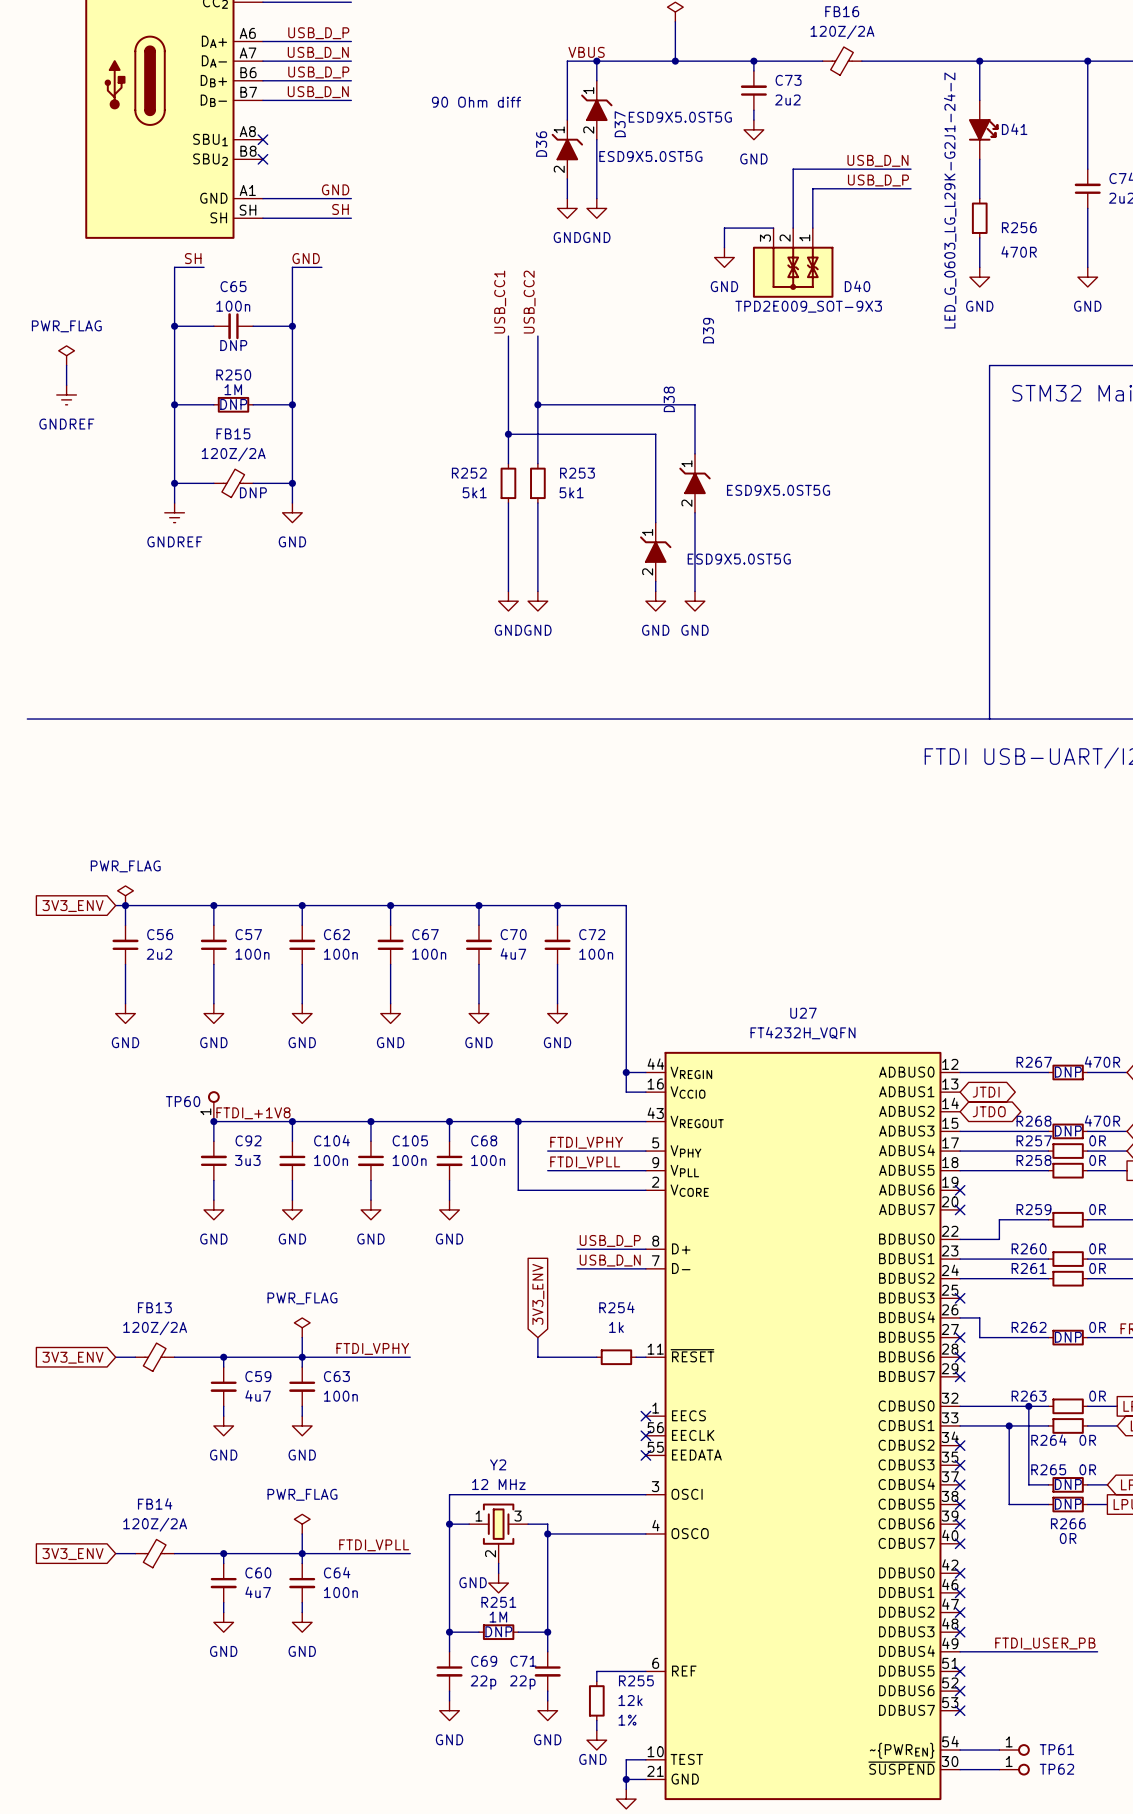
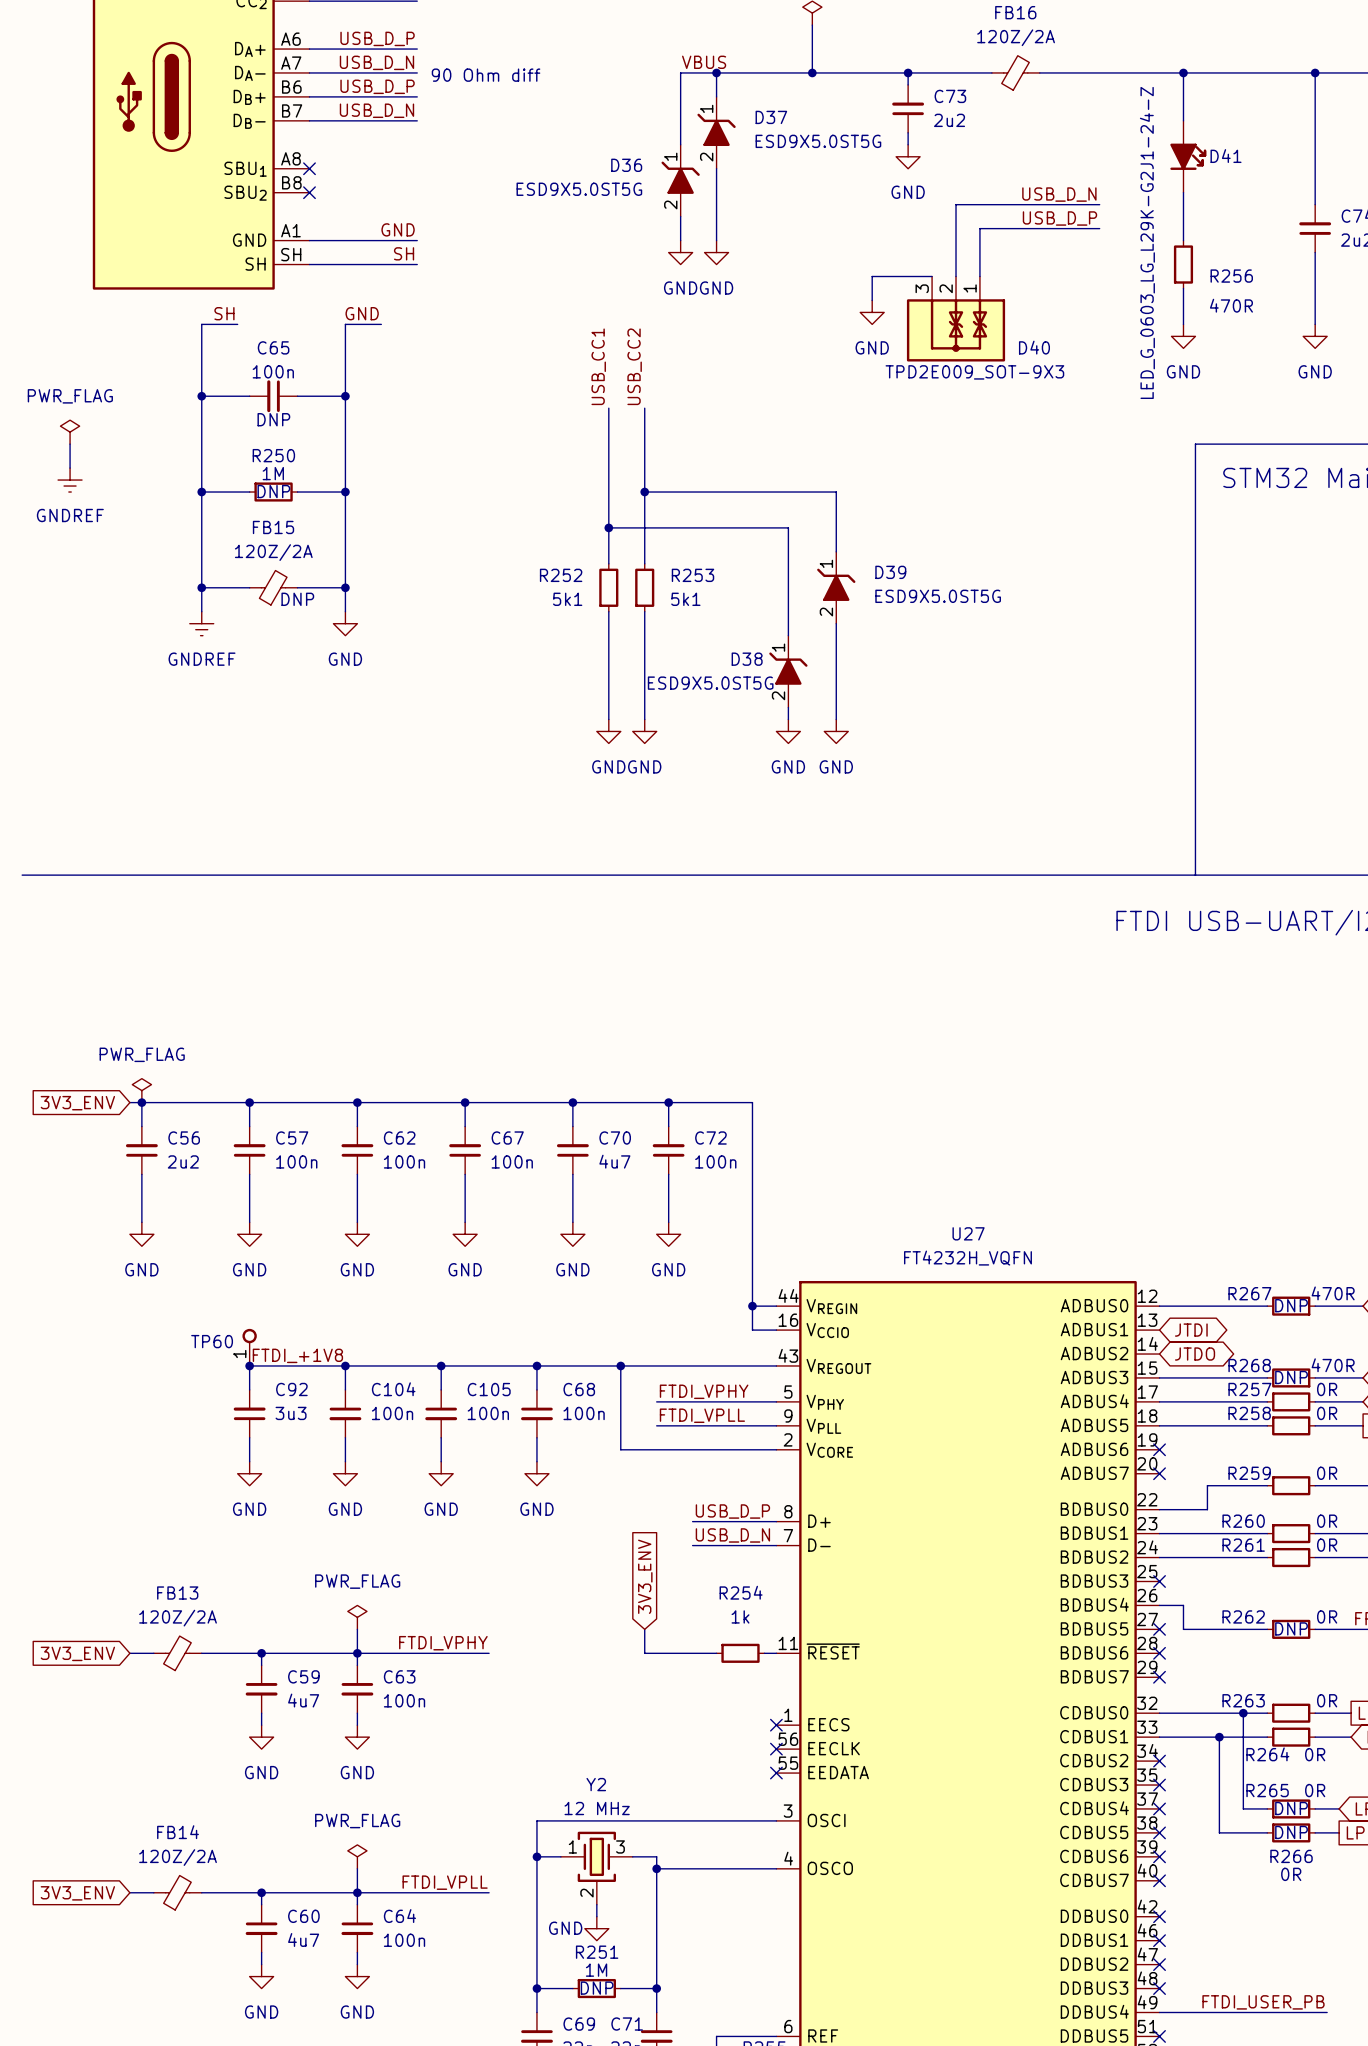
text position: 90 Ohm diff (476, 102) -> 90 Ohm diff (486, 75)
D37 name rotation: 0° (620, 124) -> 90° clockwise (771, 117)
D36 name rotation: 0° (541, 144) -> 90° clockwise (626, 165)
D36 value position: ESD9X5.0ST5G (650, 156) -> ESD9X5.0ST5G (579, 189)
D39 name rotation: 0° (708, 330) -> 90° clockwise (890, 572)
D39 name position: D39 (708, 330) -> D39 (890, 572)
D38 name rotation: 0° (669, 399) -> 90° clockwise (747, 659)
D38 name position: D38 (669, 399) -> D38 (747, 659)
D38 value position: ESD9X5.0ST5G (739, 559) -> ESD9X5.0ST5G (710, 683)

